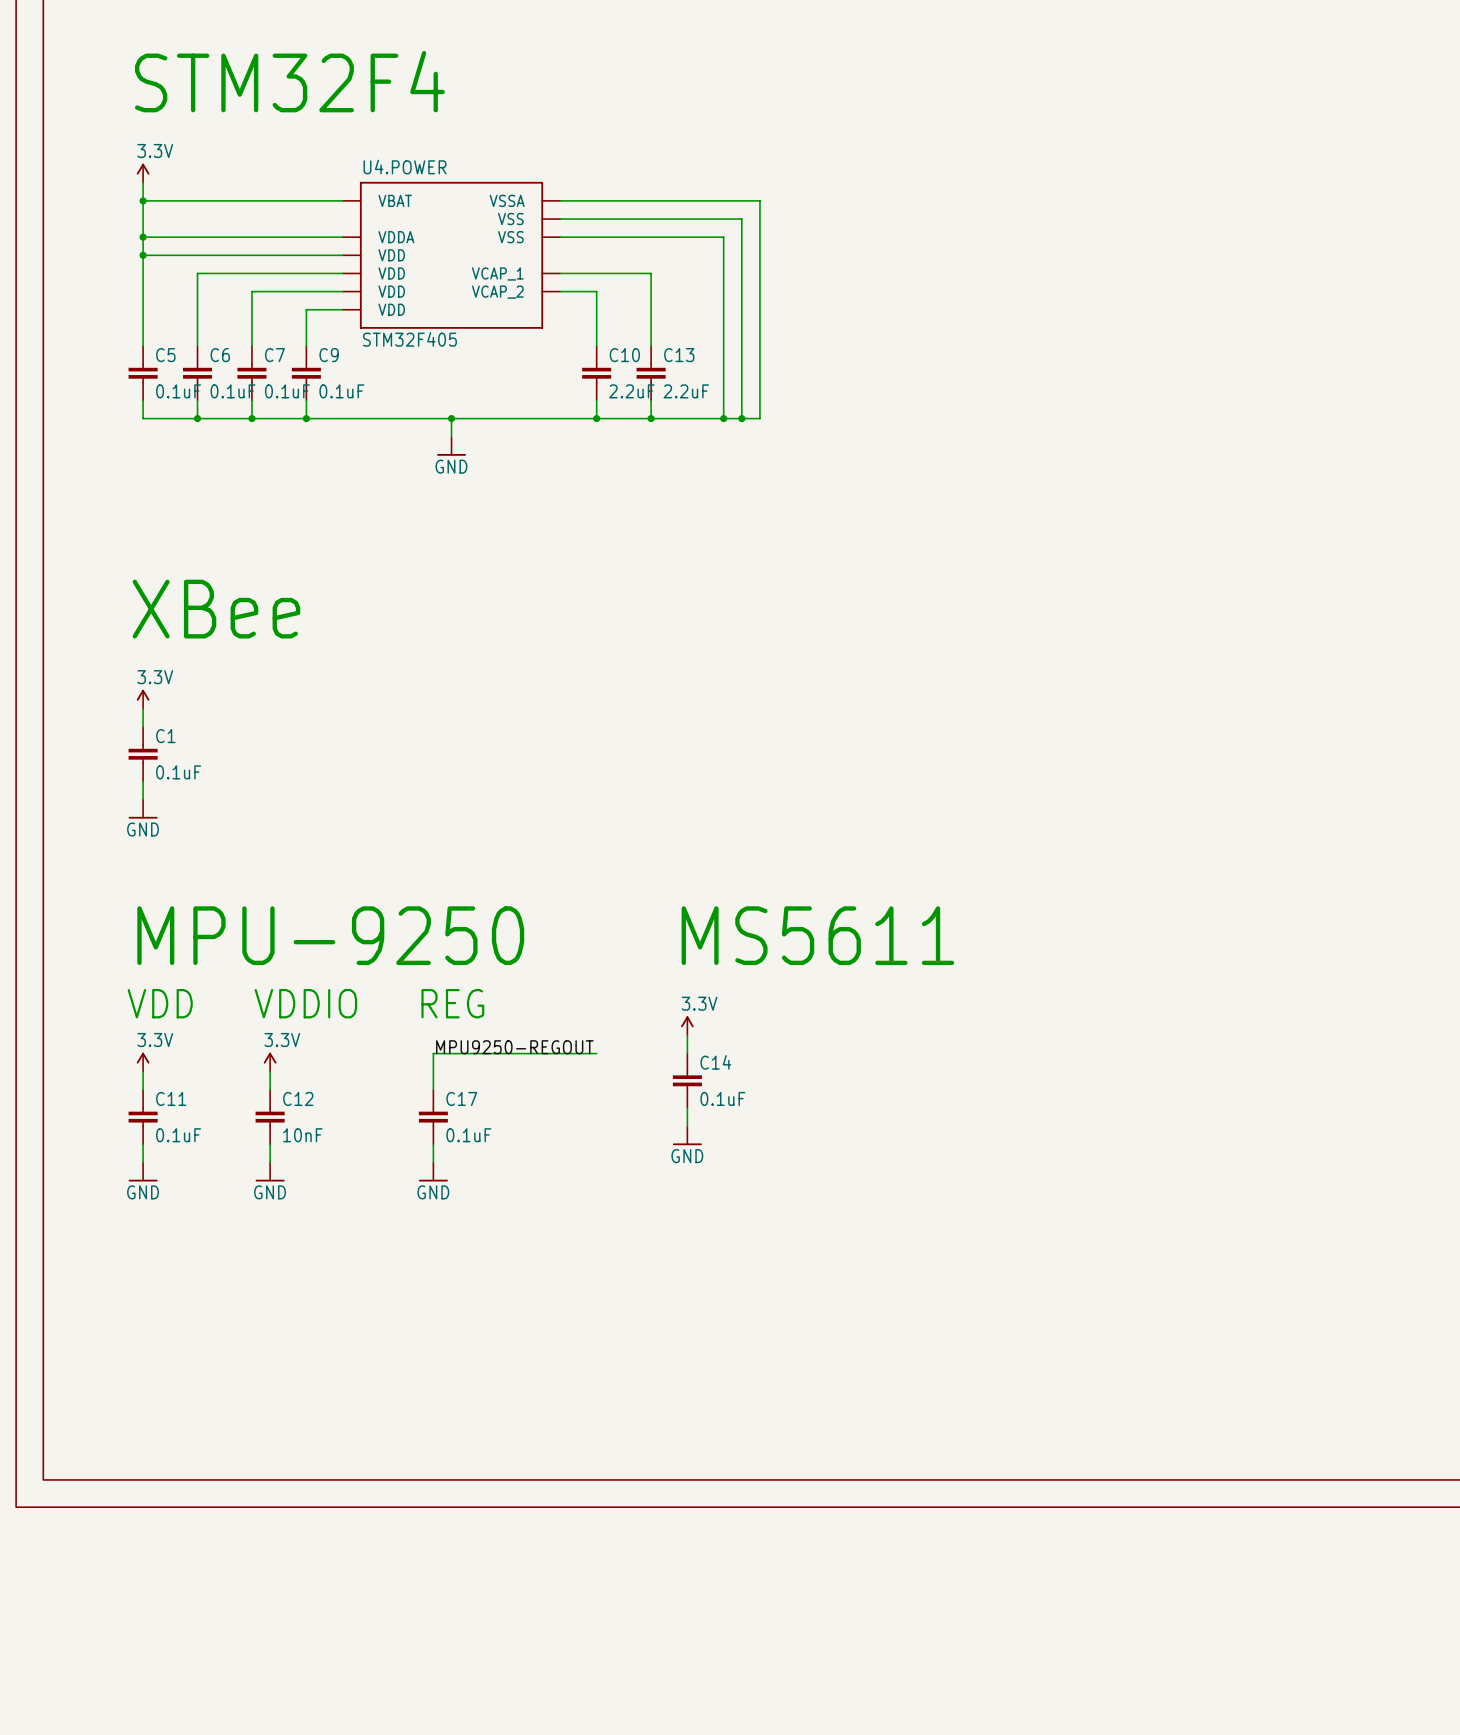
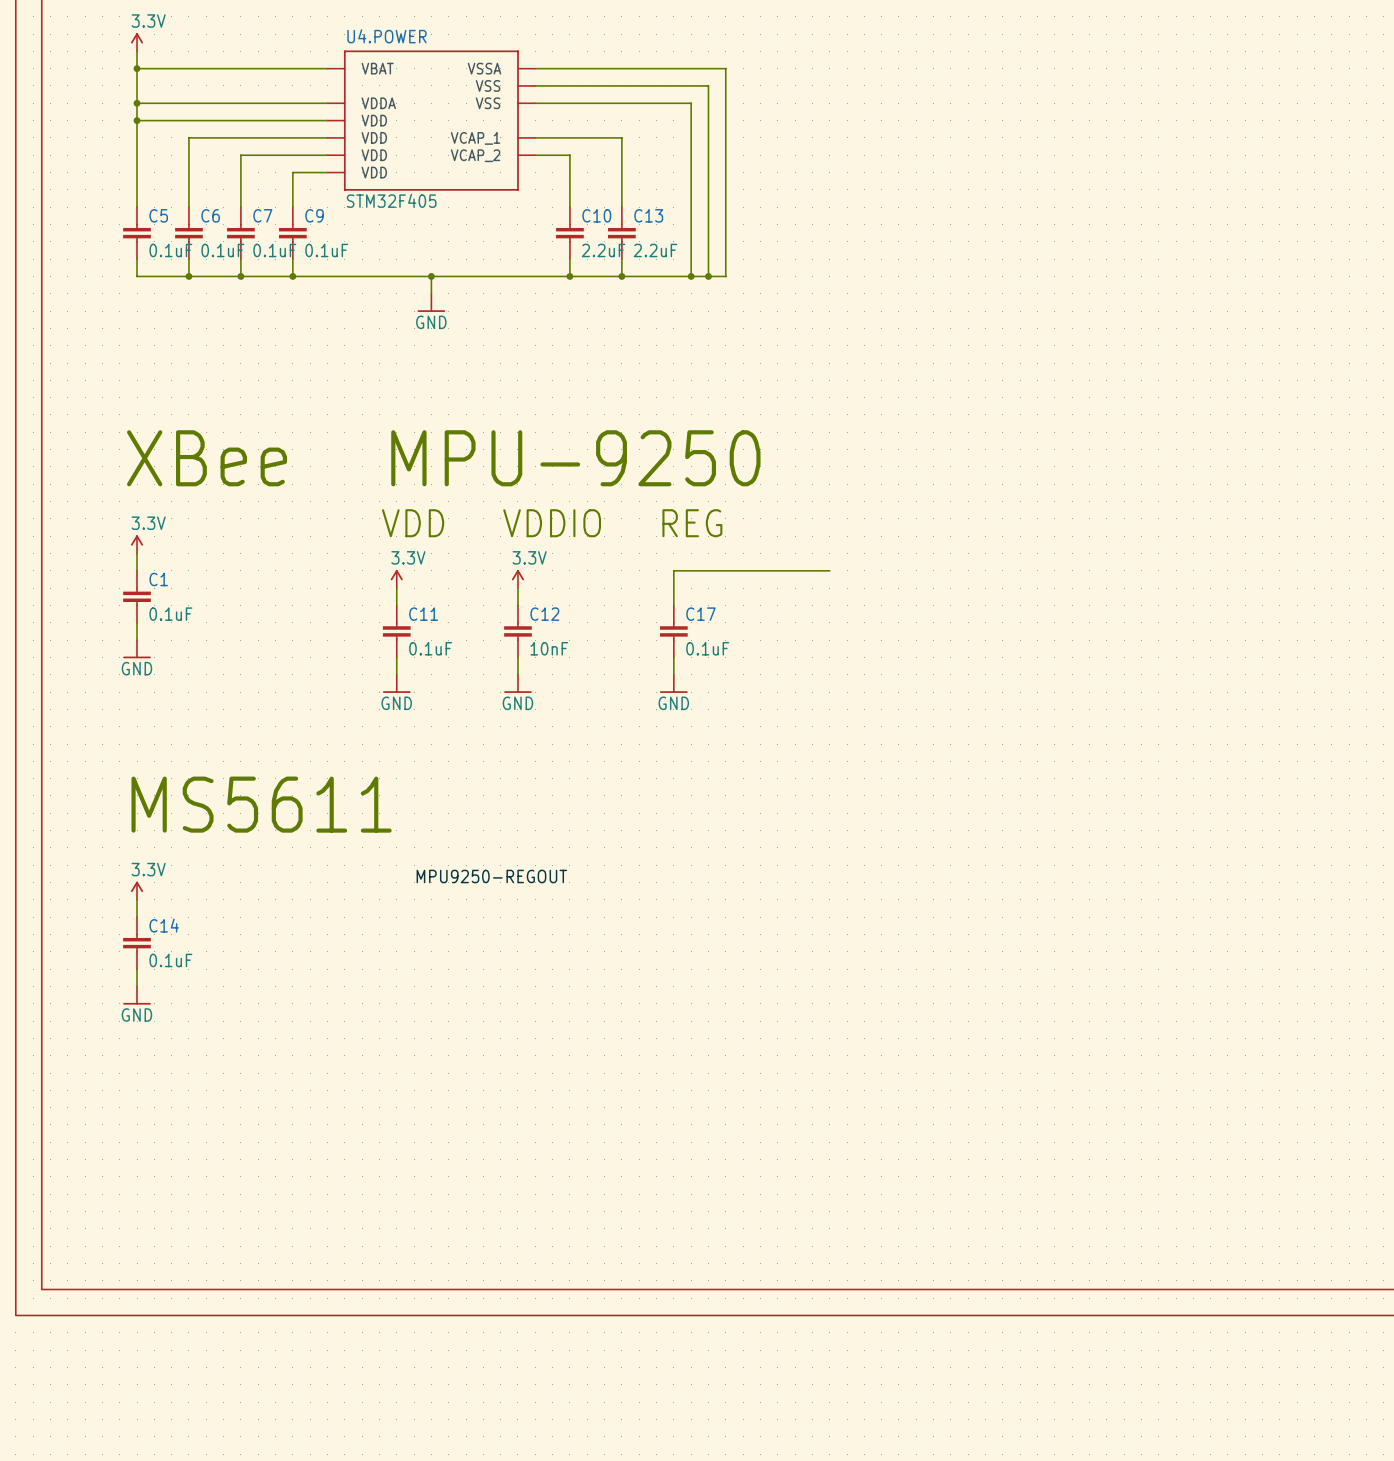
text: none -> MPU-9250 (575, 458)
text: none -> VDD (413, 523)
text: none -> VDDIO (552, 523)
text: none -> REG (692, 523)
wire: none -> (829, 570) (673, 570) (673, 605)
power symbol: none -> 3.3V (396, 579)
power symbol: none -> 3.3V (517, 579)
wire: none -> (396, 588) (396, 605)
wire: none -> (517, 588) (517, 605)
C11: none -> 0.1uF (396, 631)
wire: none -> (396, 657) (396, 674)
wire: none -> (517, 657) (517, 674)
wire: none -> (673, 657) (673, 674)
power symbol: none -> GND (396, 683)
power symbol: none -> GND (517, 683)
power symbol: none -> GND (673, 683)
text: MPU-9250 (330, 935) -> none
text: MS5611 (817, 935) -> none
text: none -> MS5611 (261, 804)
text: VDD (160, 1003) -> none
text: VDDIO (305, 1003) -> none
text: REG (452, 1003) -> none
power symbol: 3.3V (687, 1025) -> none
wire: (687, 1035) (687, 1053) -> none
wire: (596, 1053) (433, 1053) (433, 1089) -> none
power symbol: 3.3V (270, 1062) -> none
wire: (270, 1071) (270, 1089) -> none
C14: 0.1uF (687, 1080) -> none
C11 name: C11 (171, 1098) -> C14 (164, 925)
wire: (687, 1108) (687, 1126) -> none
C12 position: (270, 1117) -> (517, 631)
C17 position: (433, 1117) -> (673, 631)
power symbol: GND (687, 1135) -> none
wire: (270, 1144) (270, 1162) -> none
wire: (433, 1144) (433, 1162) -> none
power symbol: GND (270, 1171) -> none
power symbol: GND (433, 1171) -> none

